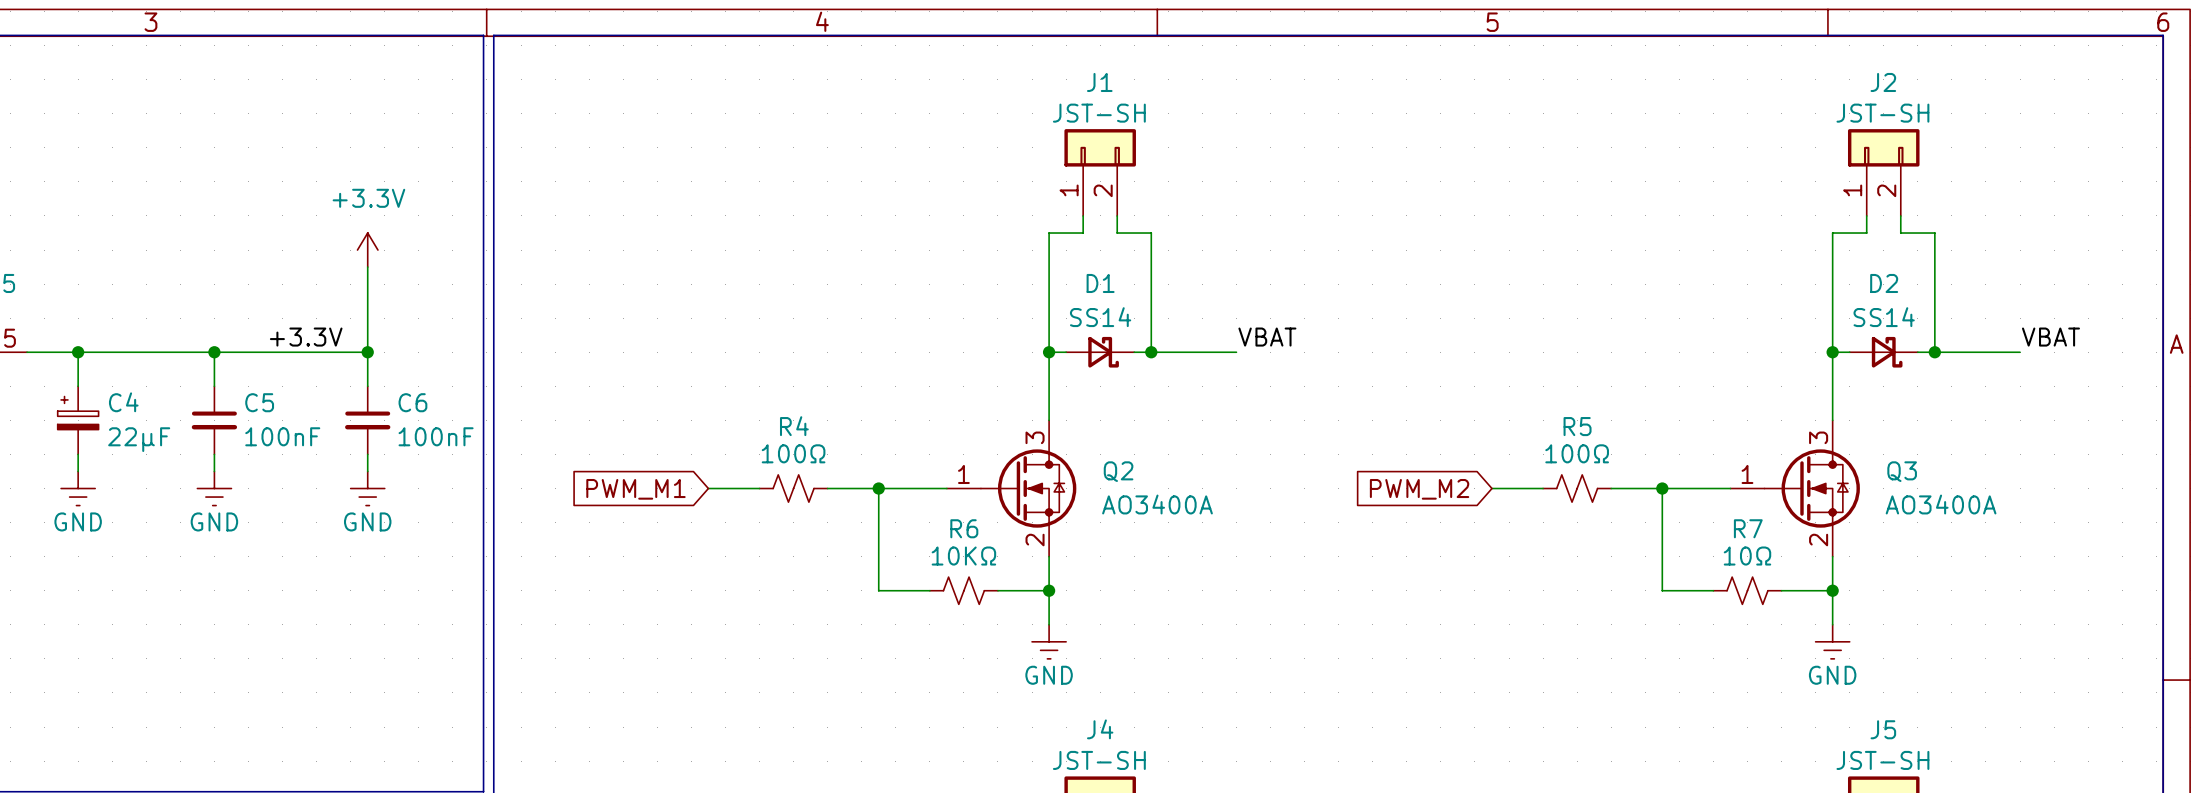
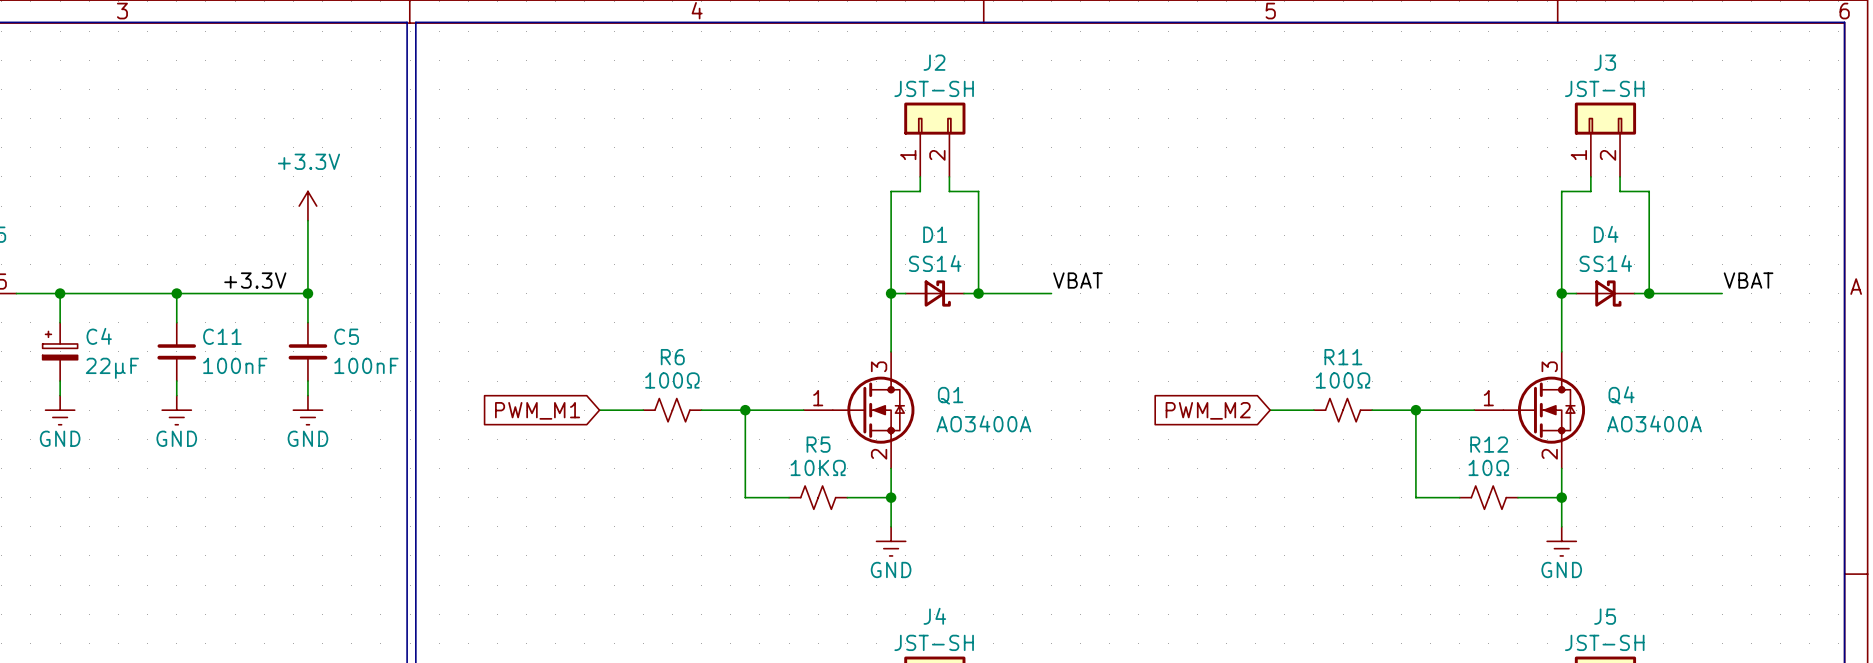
J1 name: J1 (1099, 82) -> J2 (934, 62)
J2 name: J2 (1883, 82) -> J3 (1605, 62)
D2 name: D2 (1884, 283) -> D4 (1606, 234)
C5 name: C5 (259, 402) -> C11 (222, 336)
C6 name: C6 (412, 402) -> C5 (346, 336)
R4 name: R4 (794, 426) -> R6 (672, 357)
R5 name: R5 (1577, 426) -> R11 (1343, 357)
Q2 name: Q2 (1118, 471) -> Q1 (950, 395)
Q3 name: Q3 (1902, 471) -> Q4 (1621, 395)
R6 name: R6 (964, 528) -> R5 (818, 444)
R7 name: R7 (1748, 528) -> R12 (1489, 444)

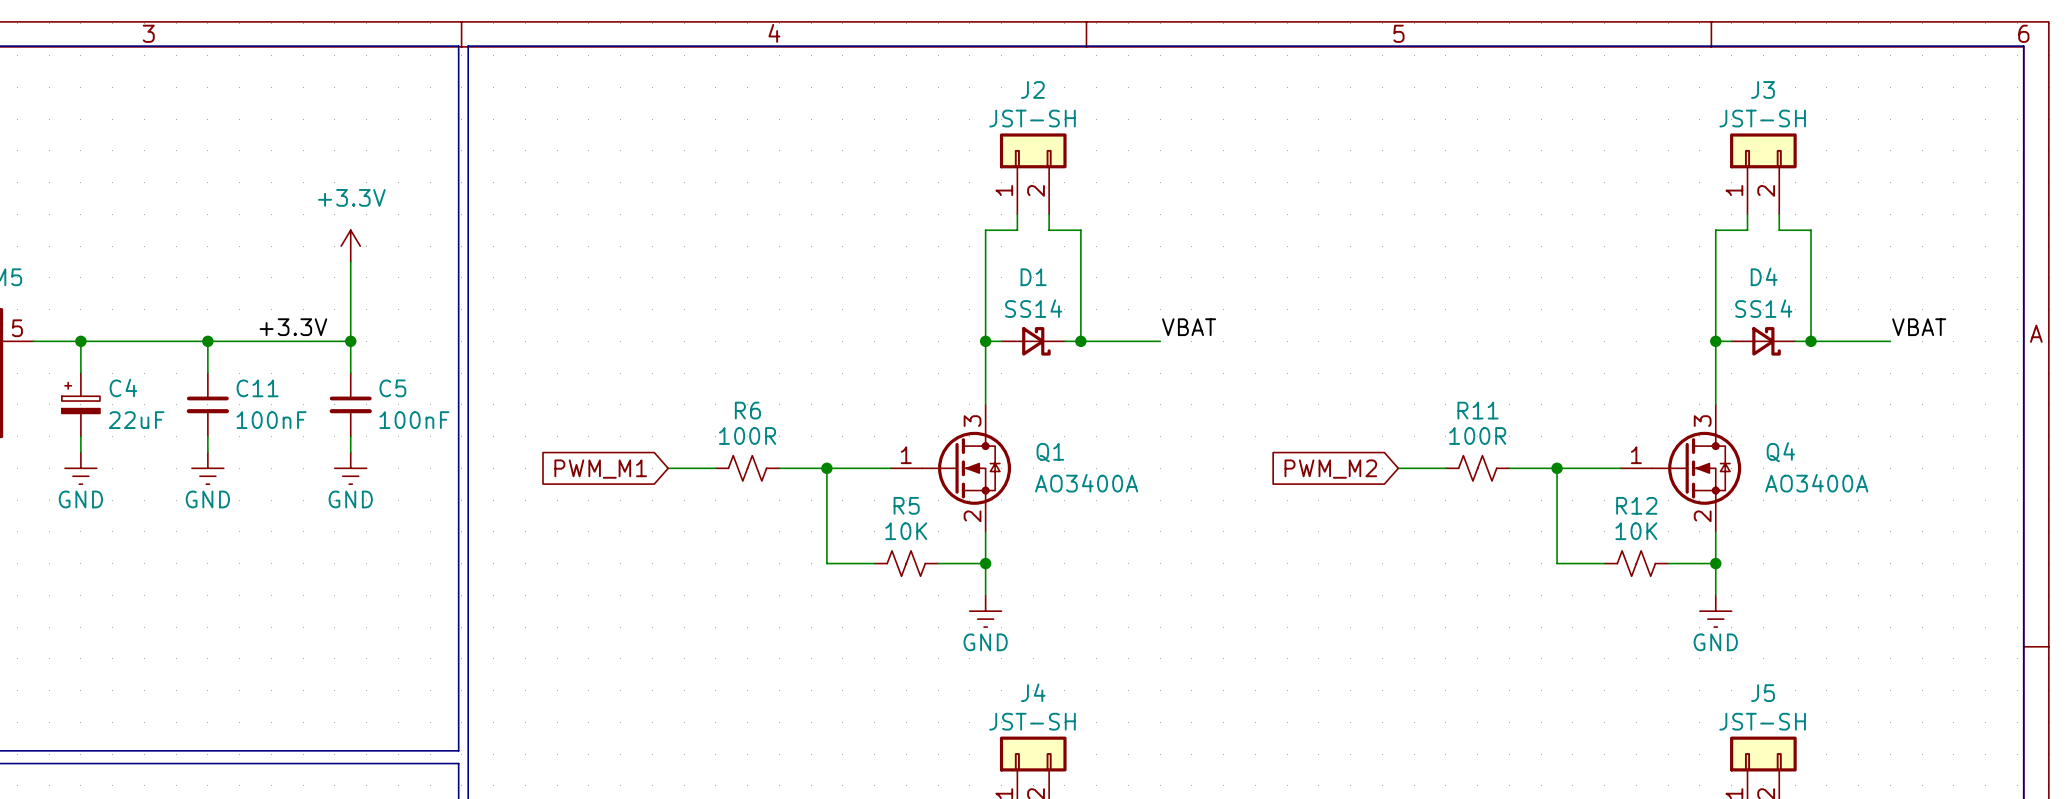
C4 value: 22µF (112, 368) -> 22uF (136, 420)
R6 value: 100Ω (672, 380) -> 100R (747, 435)
R11 value: 100Ω (1343, 380) -> 100R (1477, 435)
R5 value: 10KΩ (818, 467) -> 10K (906, 531)
R12 value: 10Ω (1488, 467) -> 10K (1636, 531)

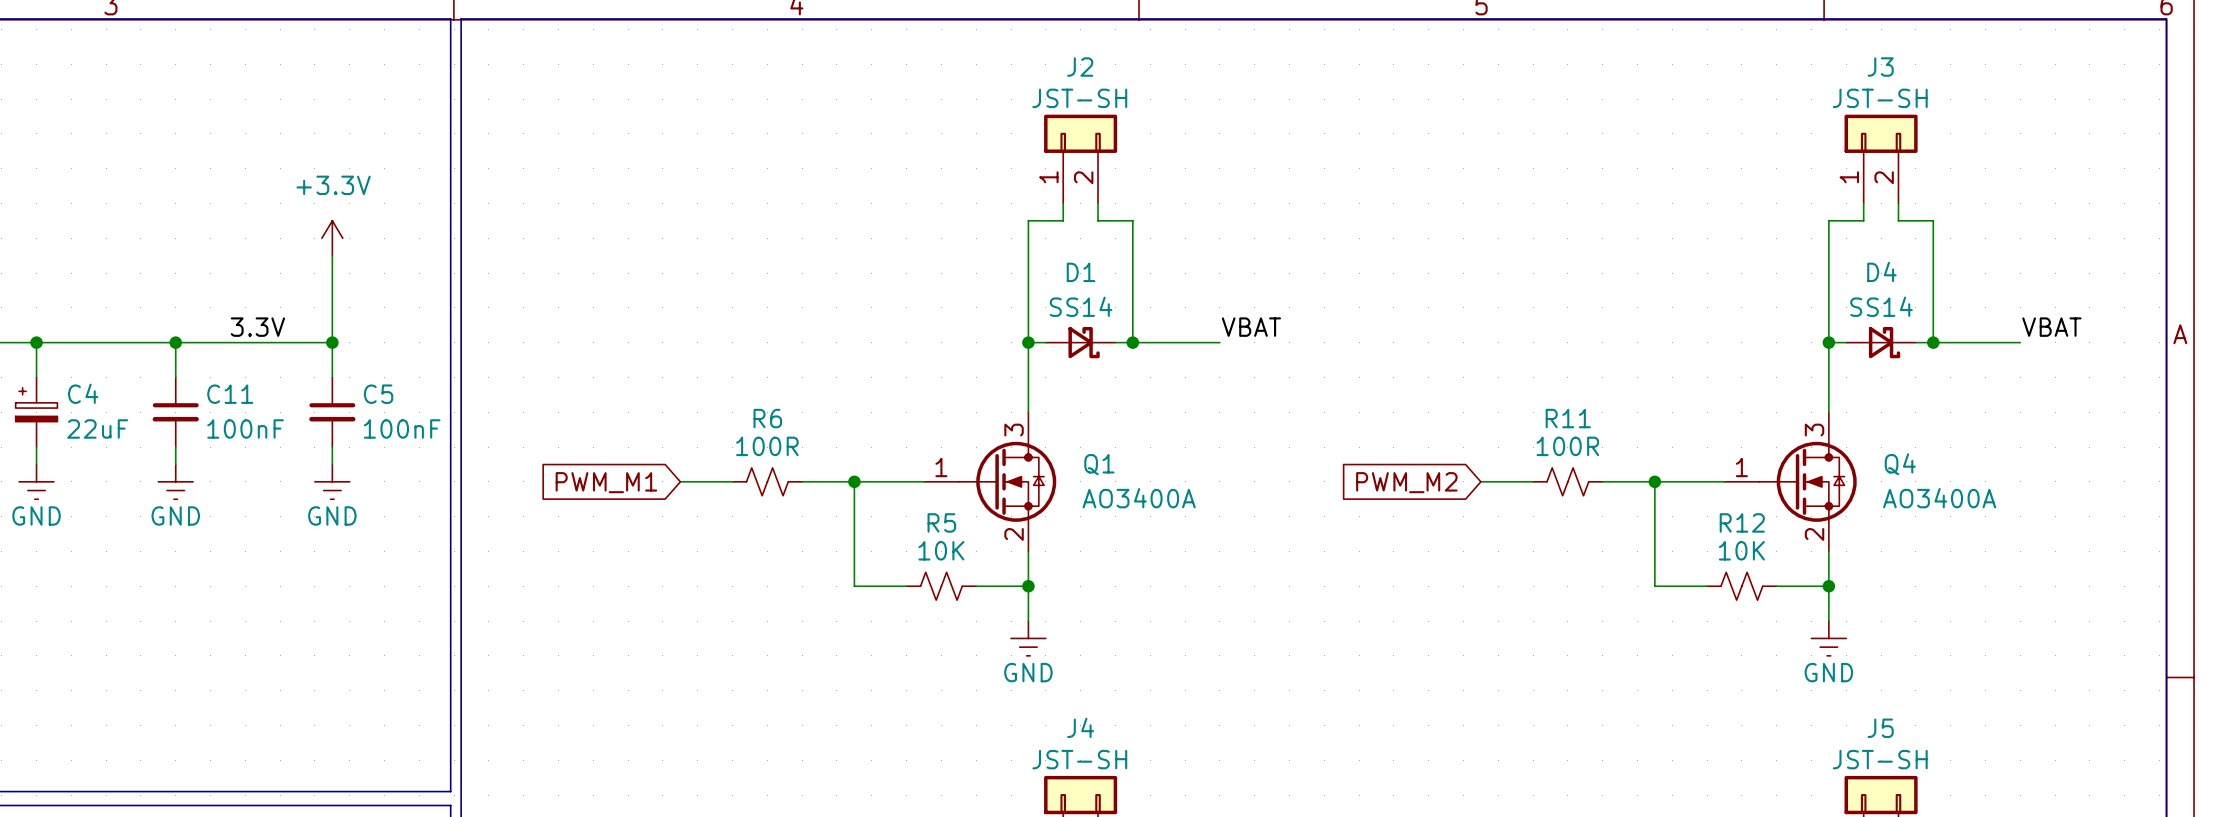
label: +3.3V (293, 327) -> 3.3V (257, 327)

